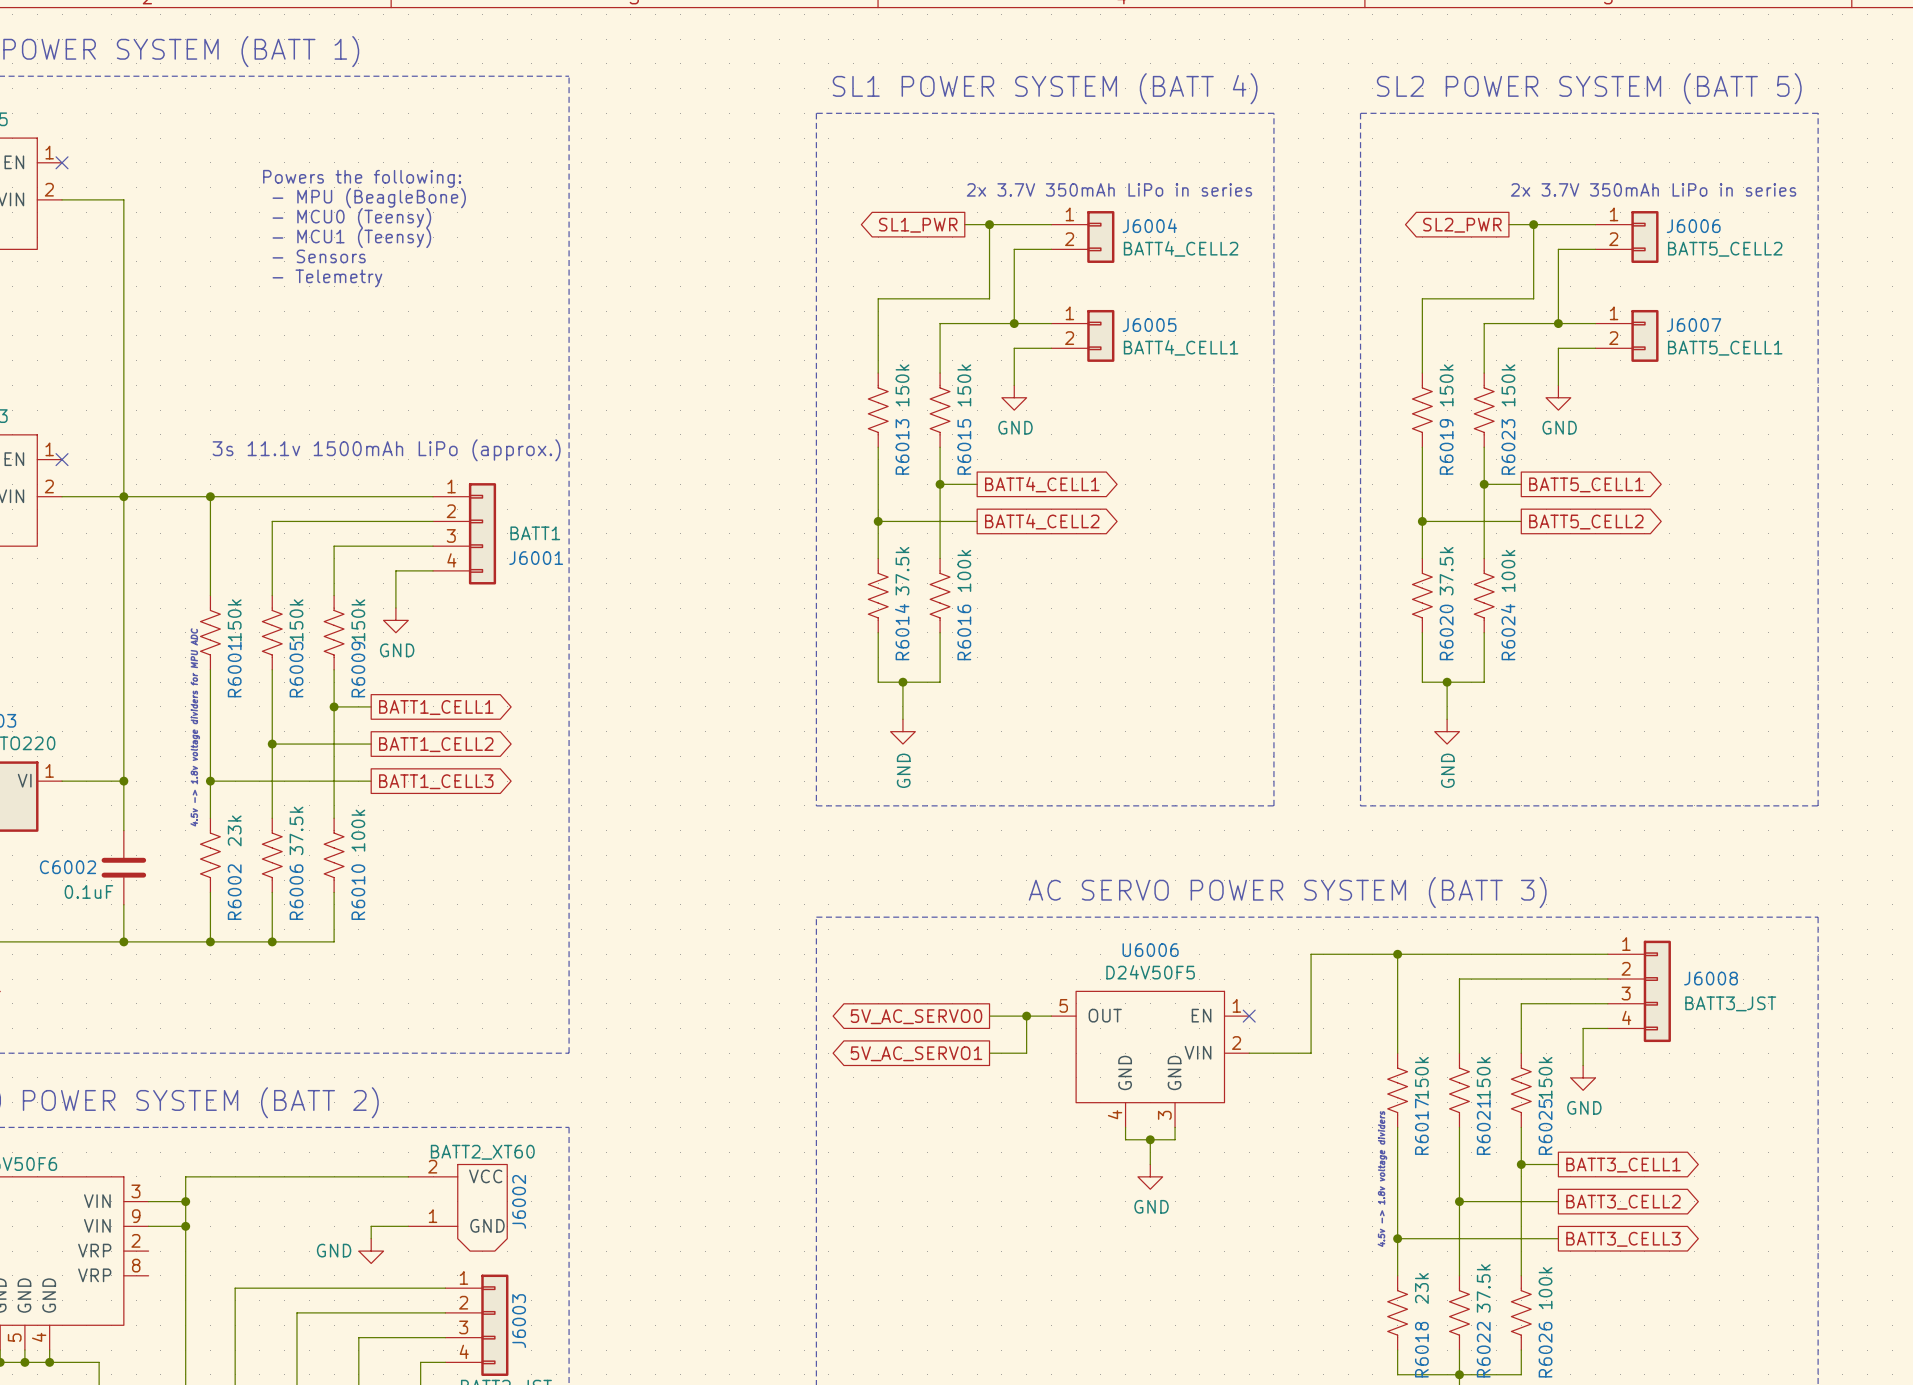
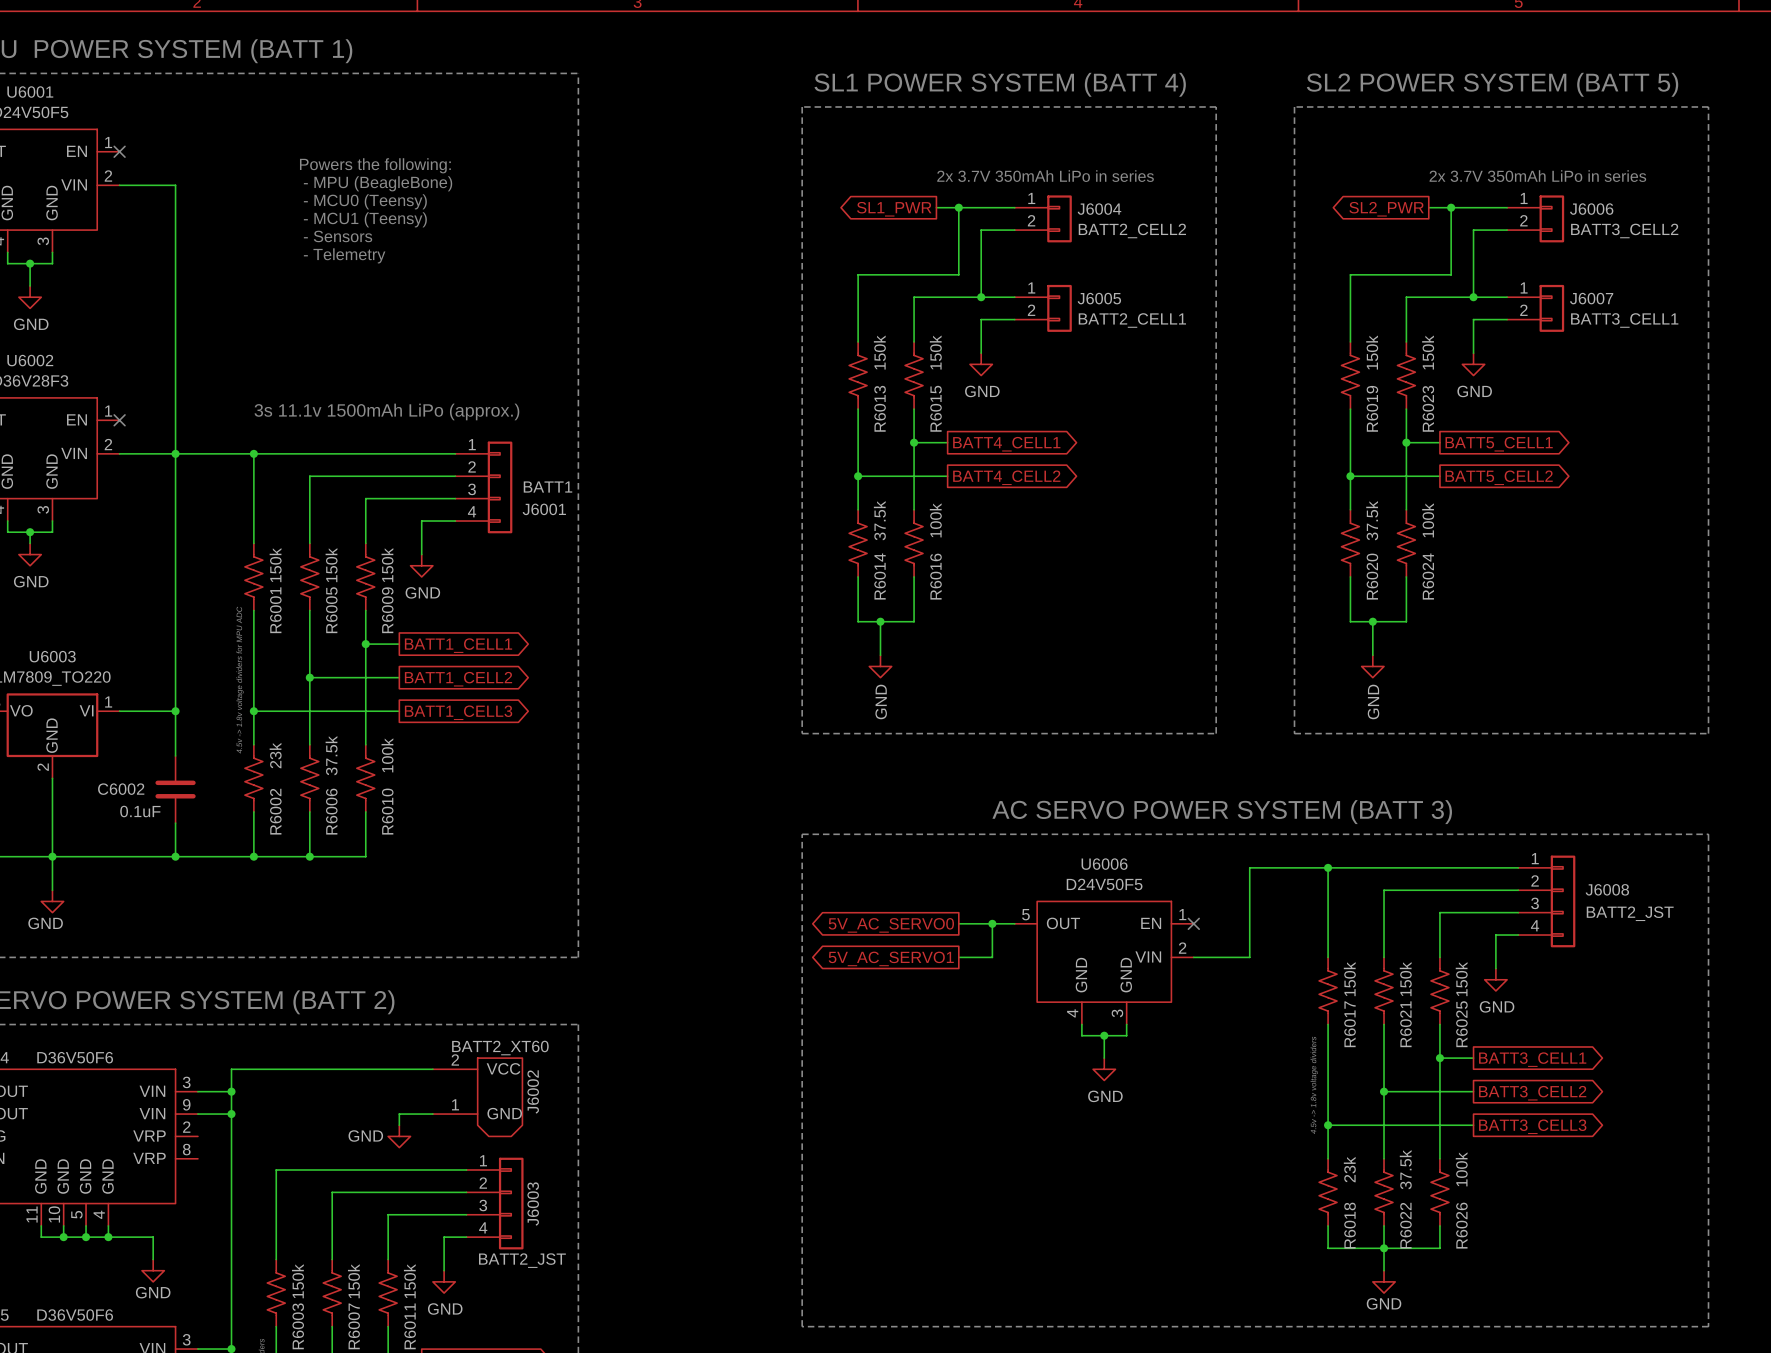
J6004 value: BATT4_CELL2 (1181, 248) -> BATT2_CELL2 (1132, 230)
J6006 value: BATT5_CELL2 (1725, 249) -> BATT3_CELL2 (1624, 230)
J6005 value: BATT4_CELL1 (1181, 347) -> BATT2_CELL1 (1132, 320)
J6007 value: BATT5_CELL1 (1725, 348) -> BATT3_CELL1 (1624, 320)
J6008 value: BATT3_JST (1730, 1003) -> BATT2_JST (1630, 913)

